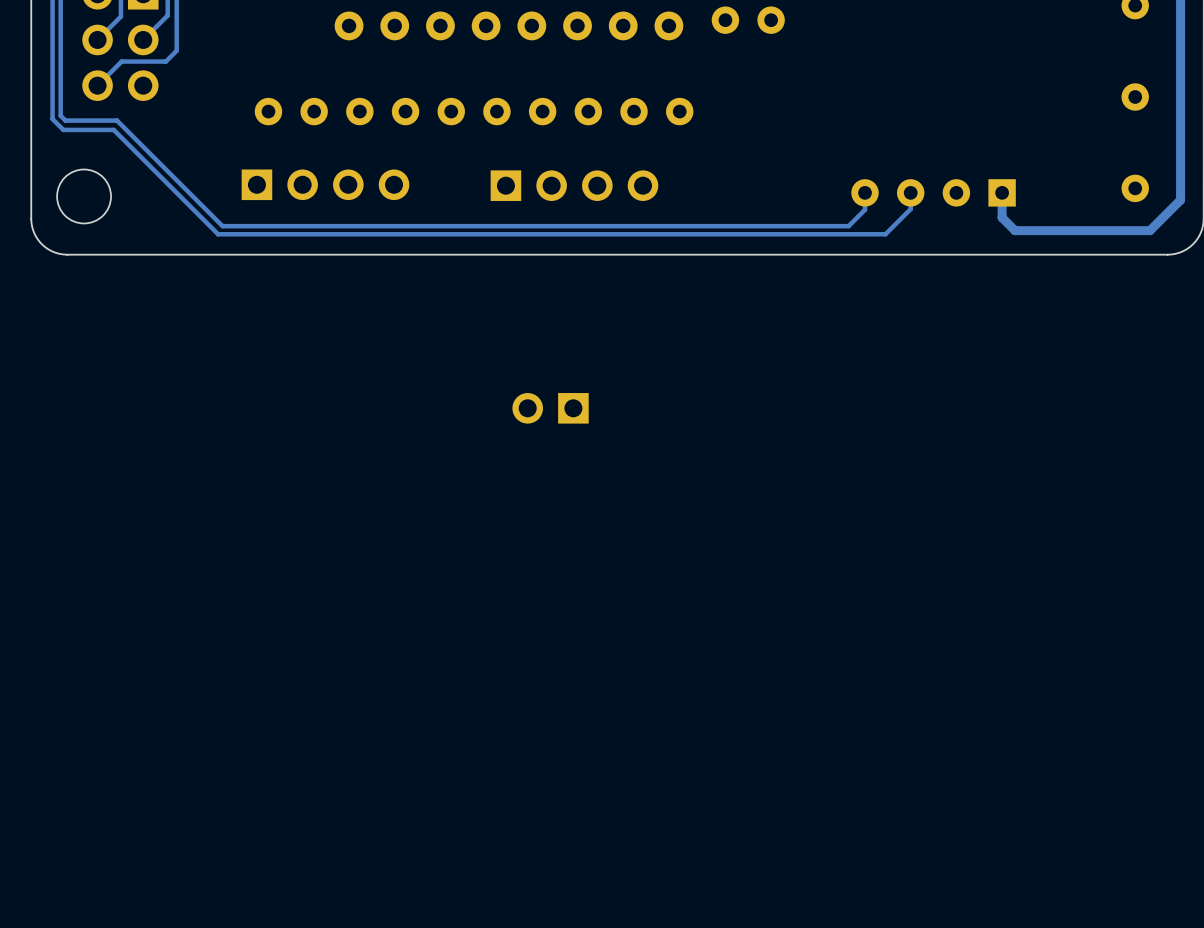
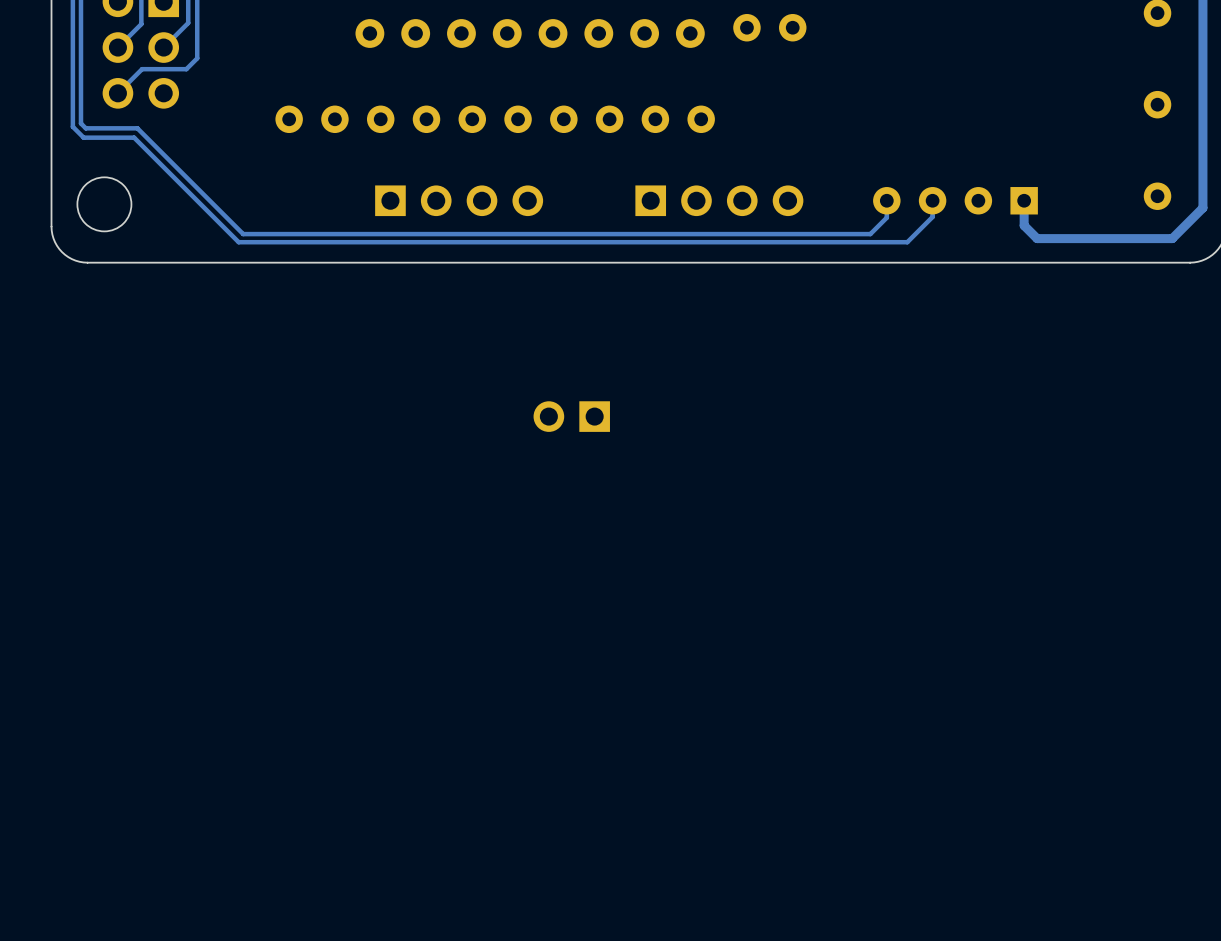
part: (325, 184) -> none
part: (574, 185) -> none
part: none -> (459, 200)
part: none -> (719, 200)

